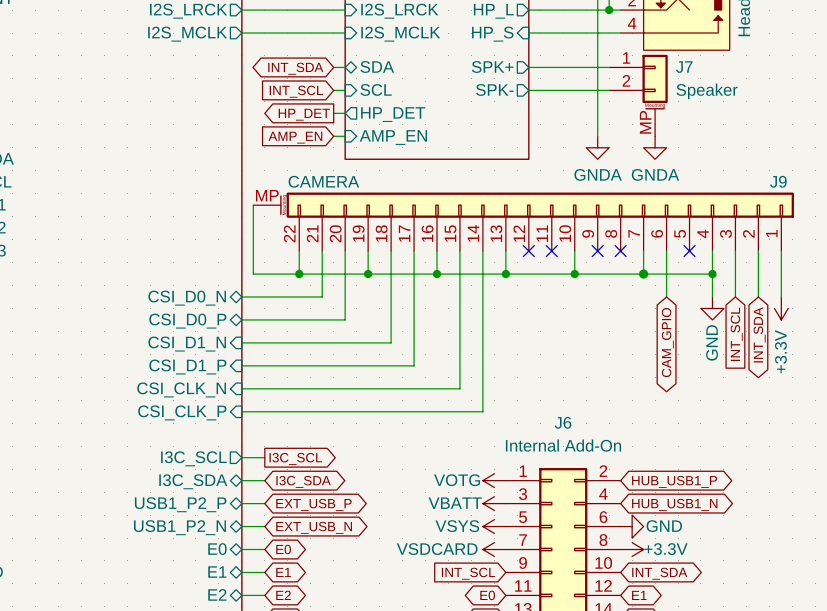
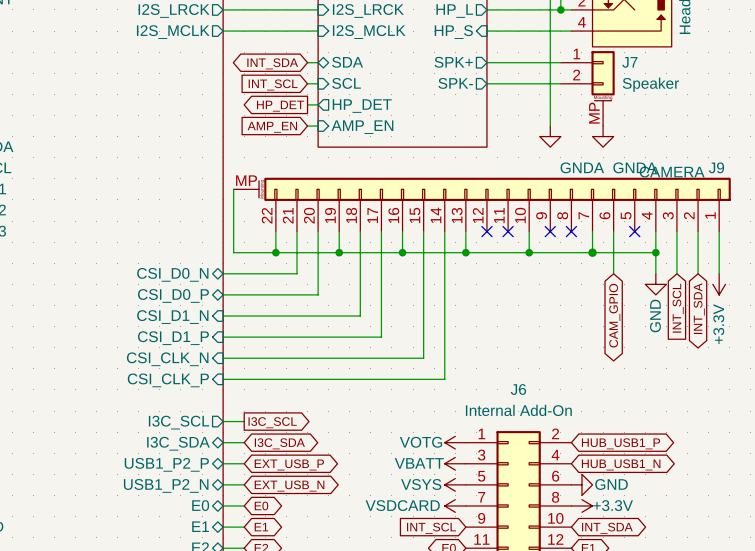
power symbol text position: GNDA (598, 174) -> GNDA (582, 167)
power symbol text position: GNDA (655, 174) -> GNDA (635, 167)
J9 value position: CAMERA (323, 181) -> CAMERA (672, 172)

